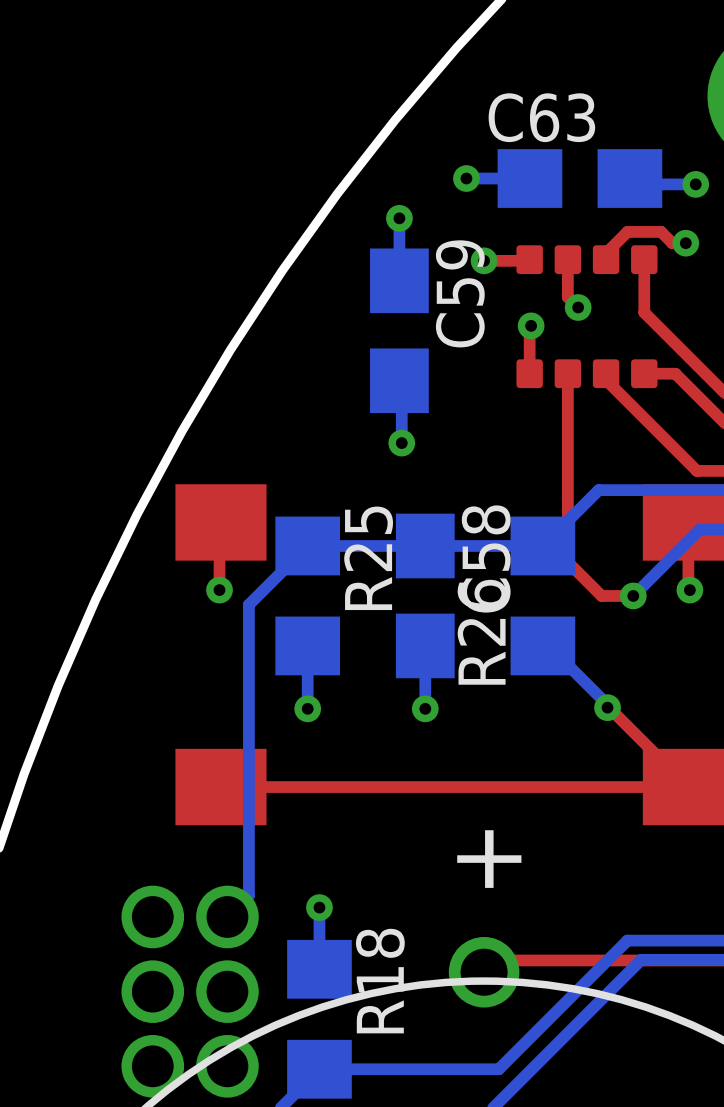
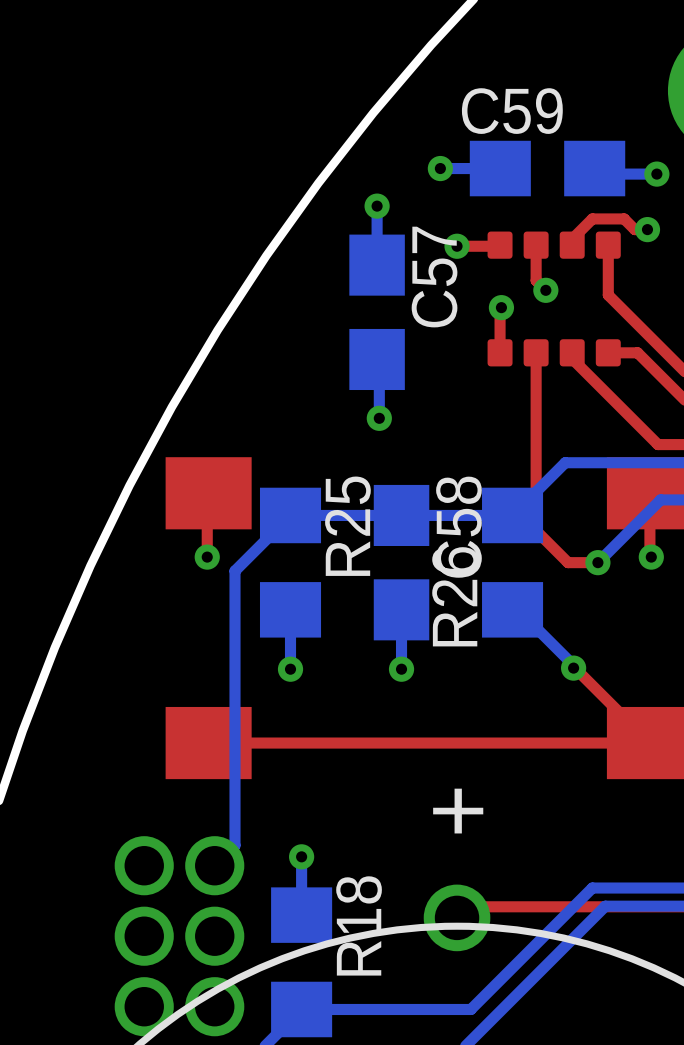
C63 name: C63 (541, 117) -> C59 (512, 111)
C59 name: C59 (460, 293) -> C57 (434, 277)

